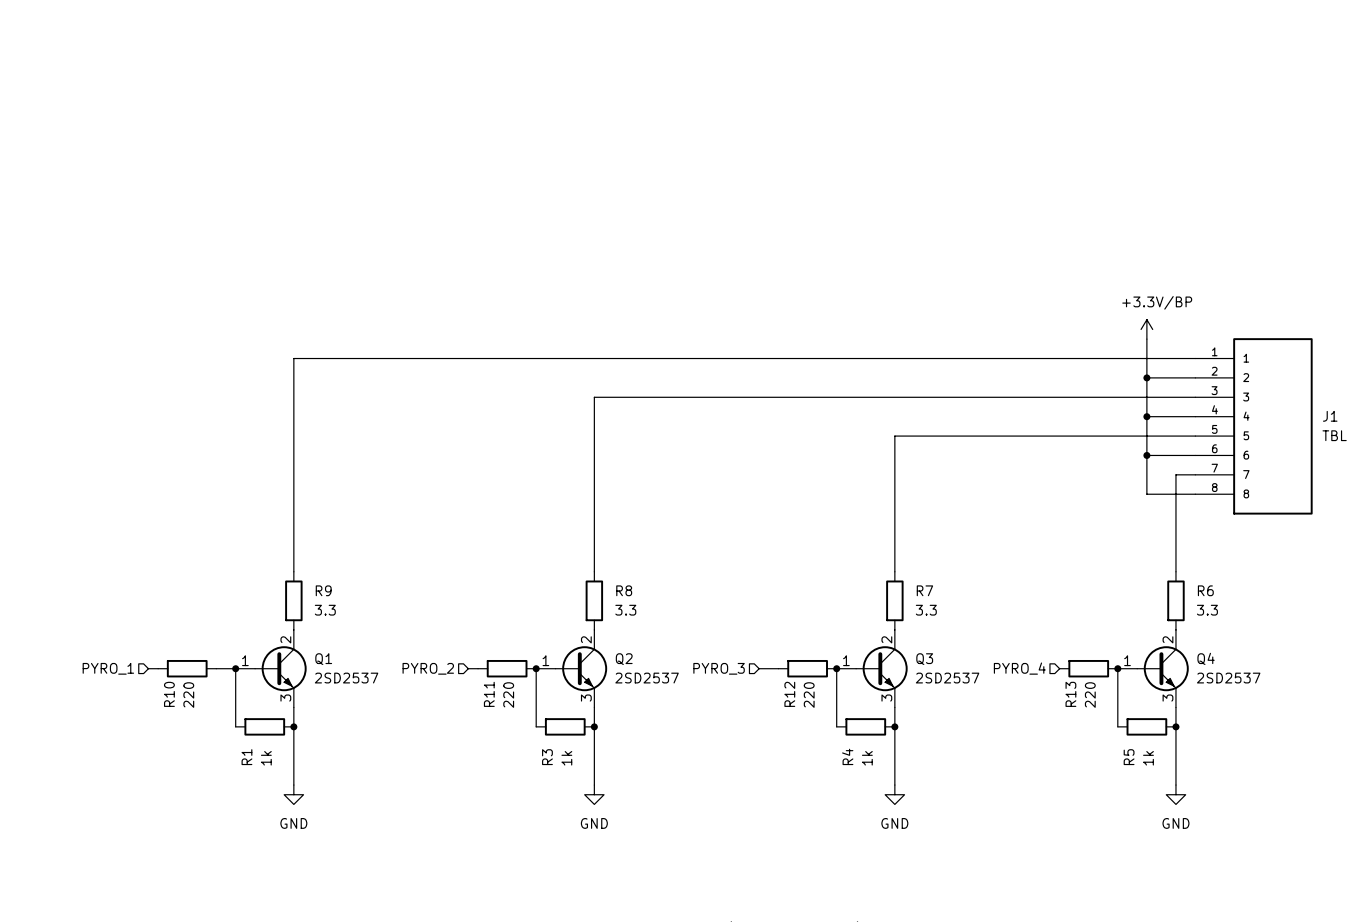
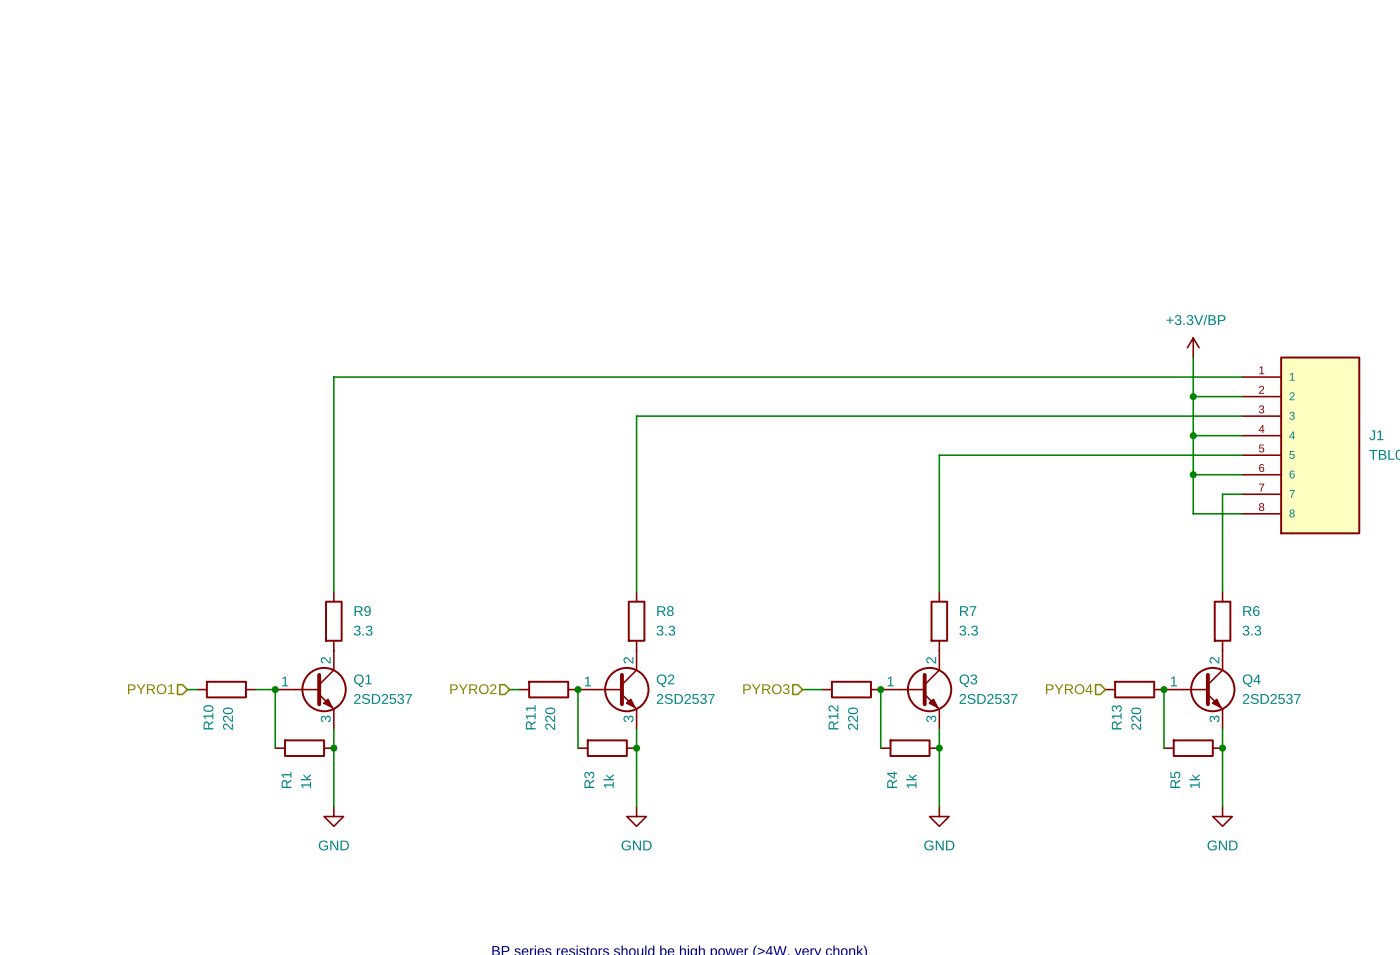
hierarchical label: PYRO_1 (108, 668) -> PYRO1 (151, 689)
hierarchical label: PYRO_2 (428, 668) -> PYRO2 (473, 689)
hierarchical label: PYRO_3 (719, 668) -> PYRO3 (766, 689)
hierarchical label: PYRO_4 (1019, 668) -> PYRO4 (1069, 689)

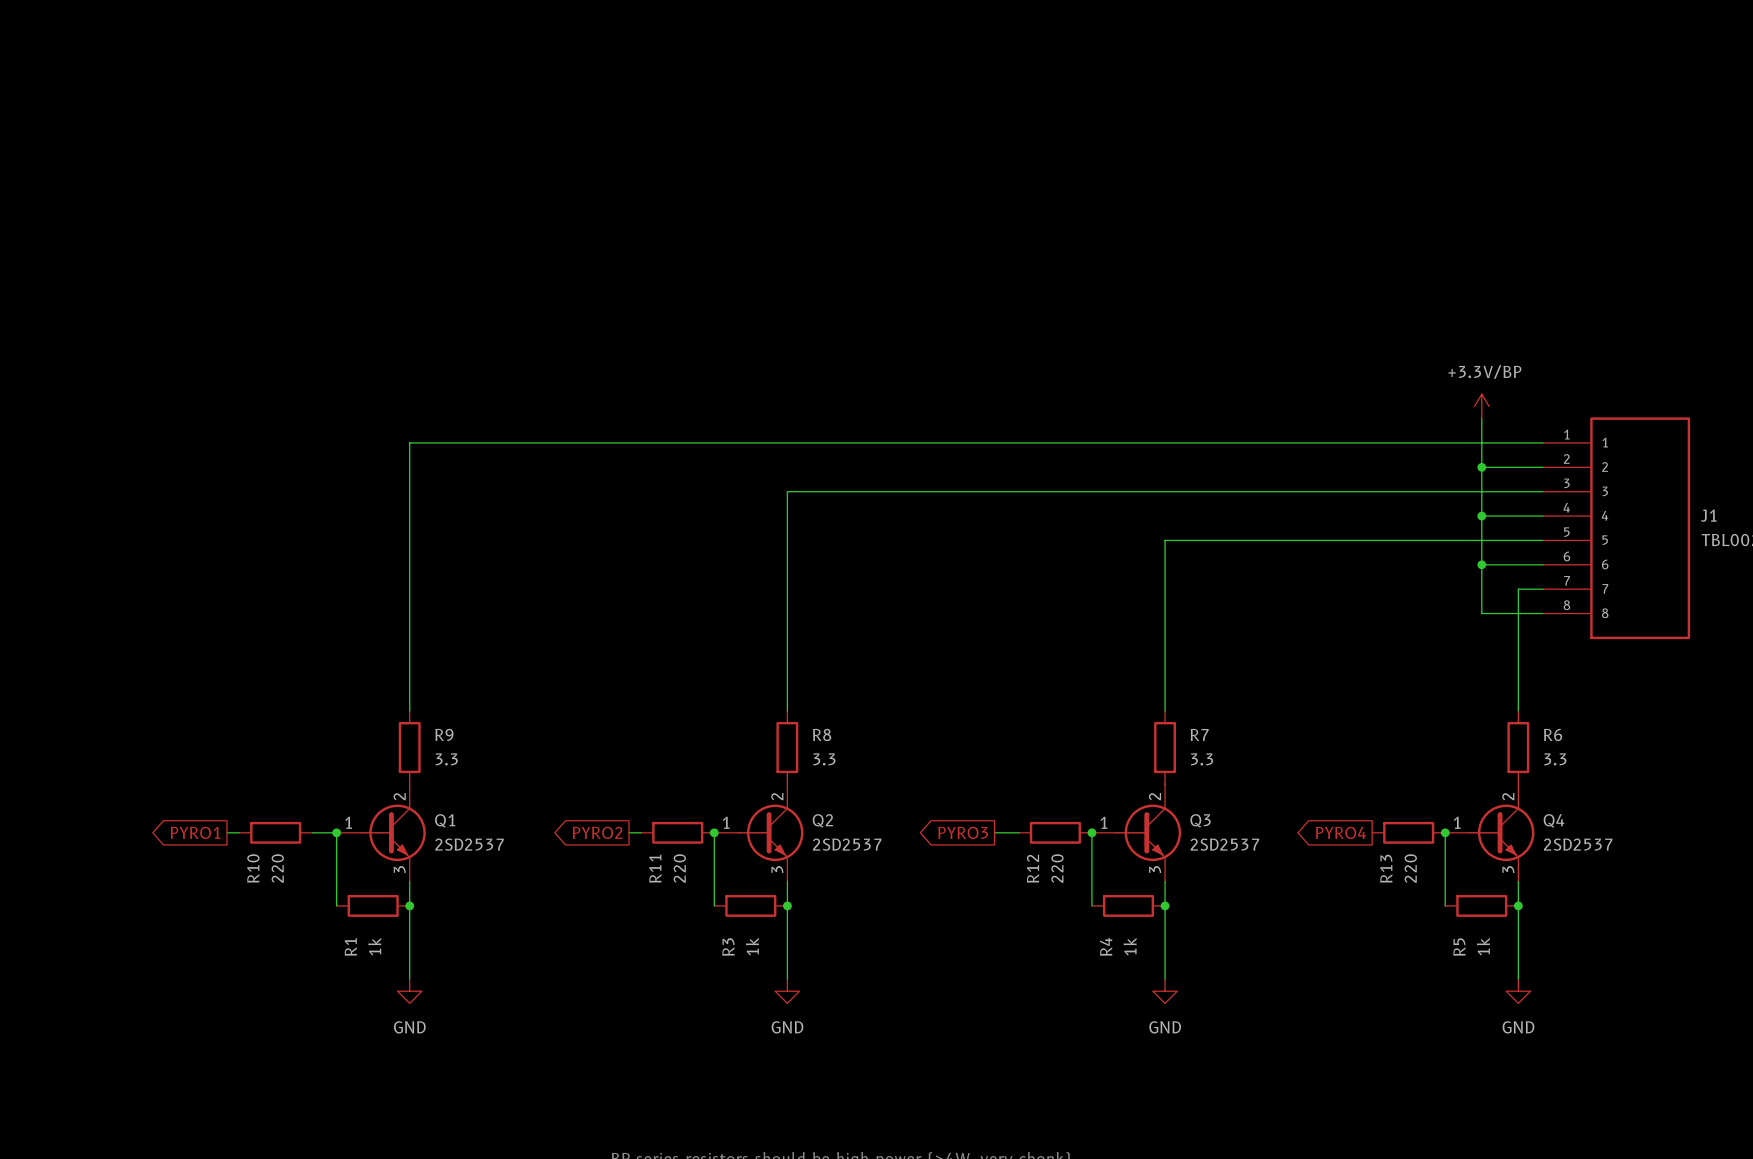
hierarchical label: PYRO1 (151, 689) -> none
global label: none -> PYRO1 (195, 832)
hierarchical label: PYRO2 (473, 689) -> none
global label: none -> PYRO2 (597, 832)
hierarchical label: PYRO3 (766, 689) -> none
global label: none -> PYRO3 (963, 832)
hierarchical label: PYRO4 (1069, 689) -> none
global label: none -> PYRO4 (1340, 832)

